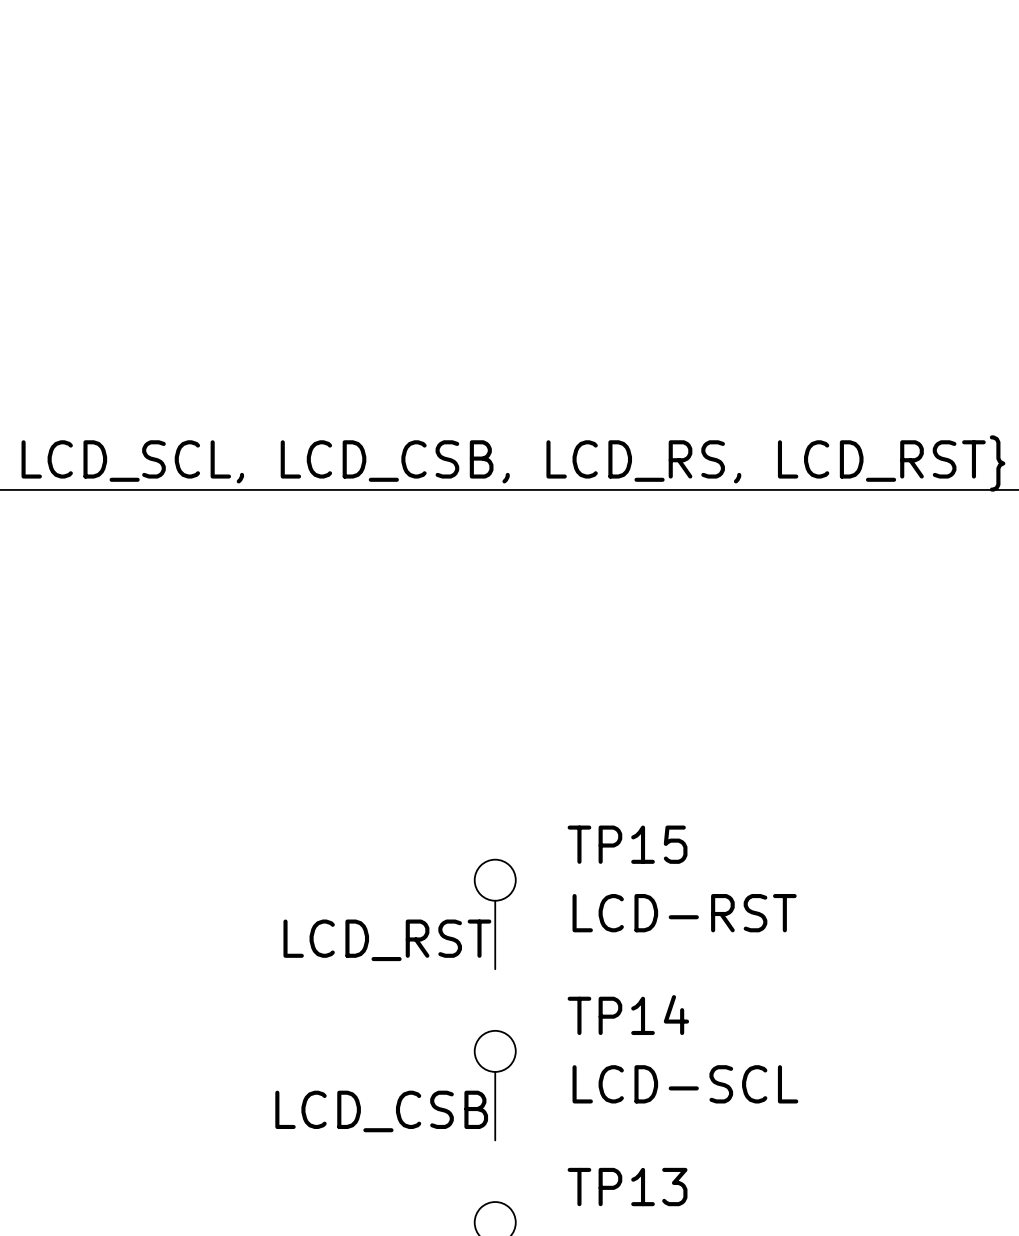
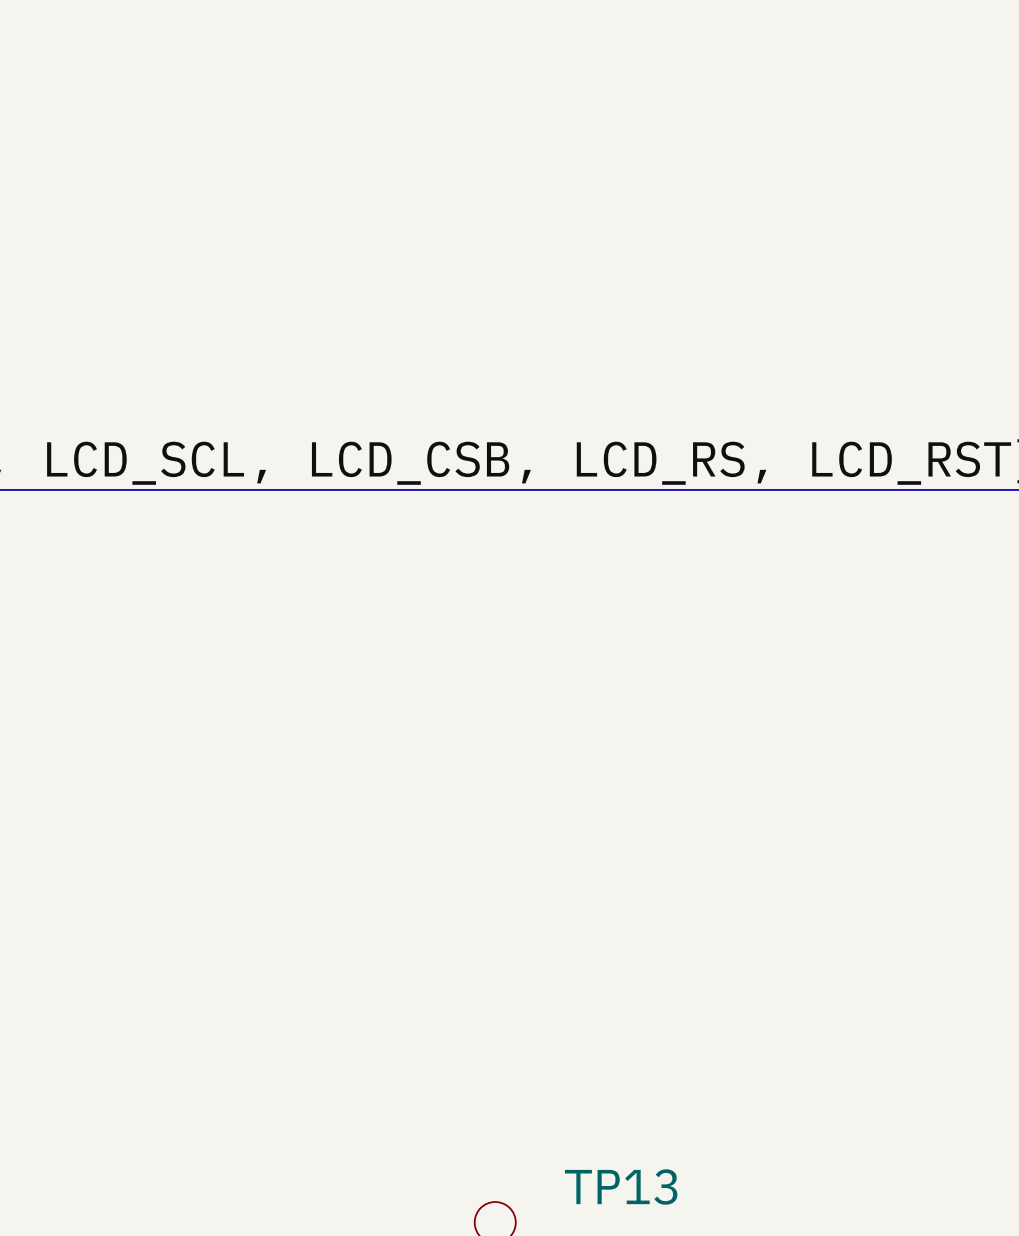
TP15: LCD-RST (495, 914) -> none
label: LCD_RST (387, 940) -> none
TP14: LCD-SCL (495, 1085) -> none
label: LCD_CSB (381, 1111) -> none

